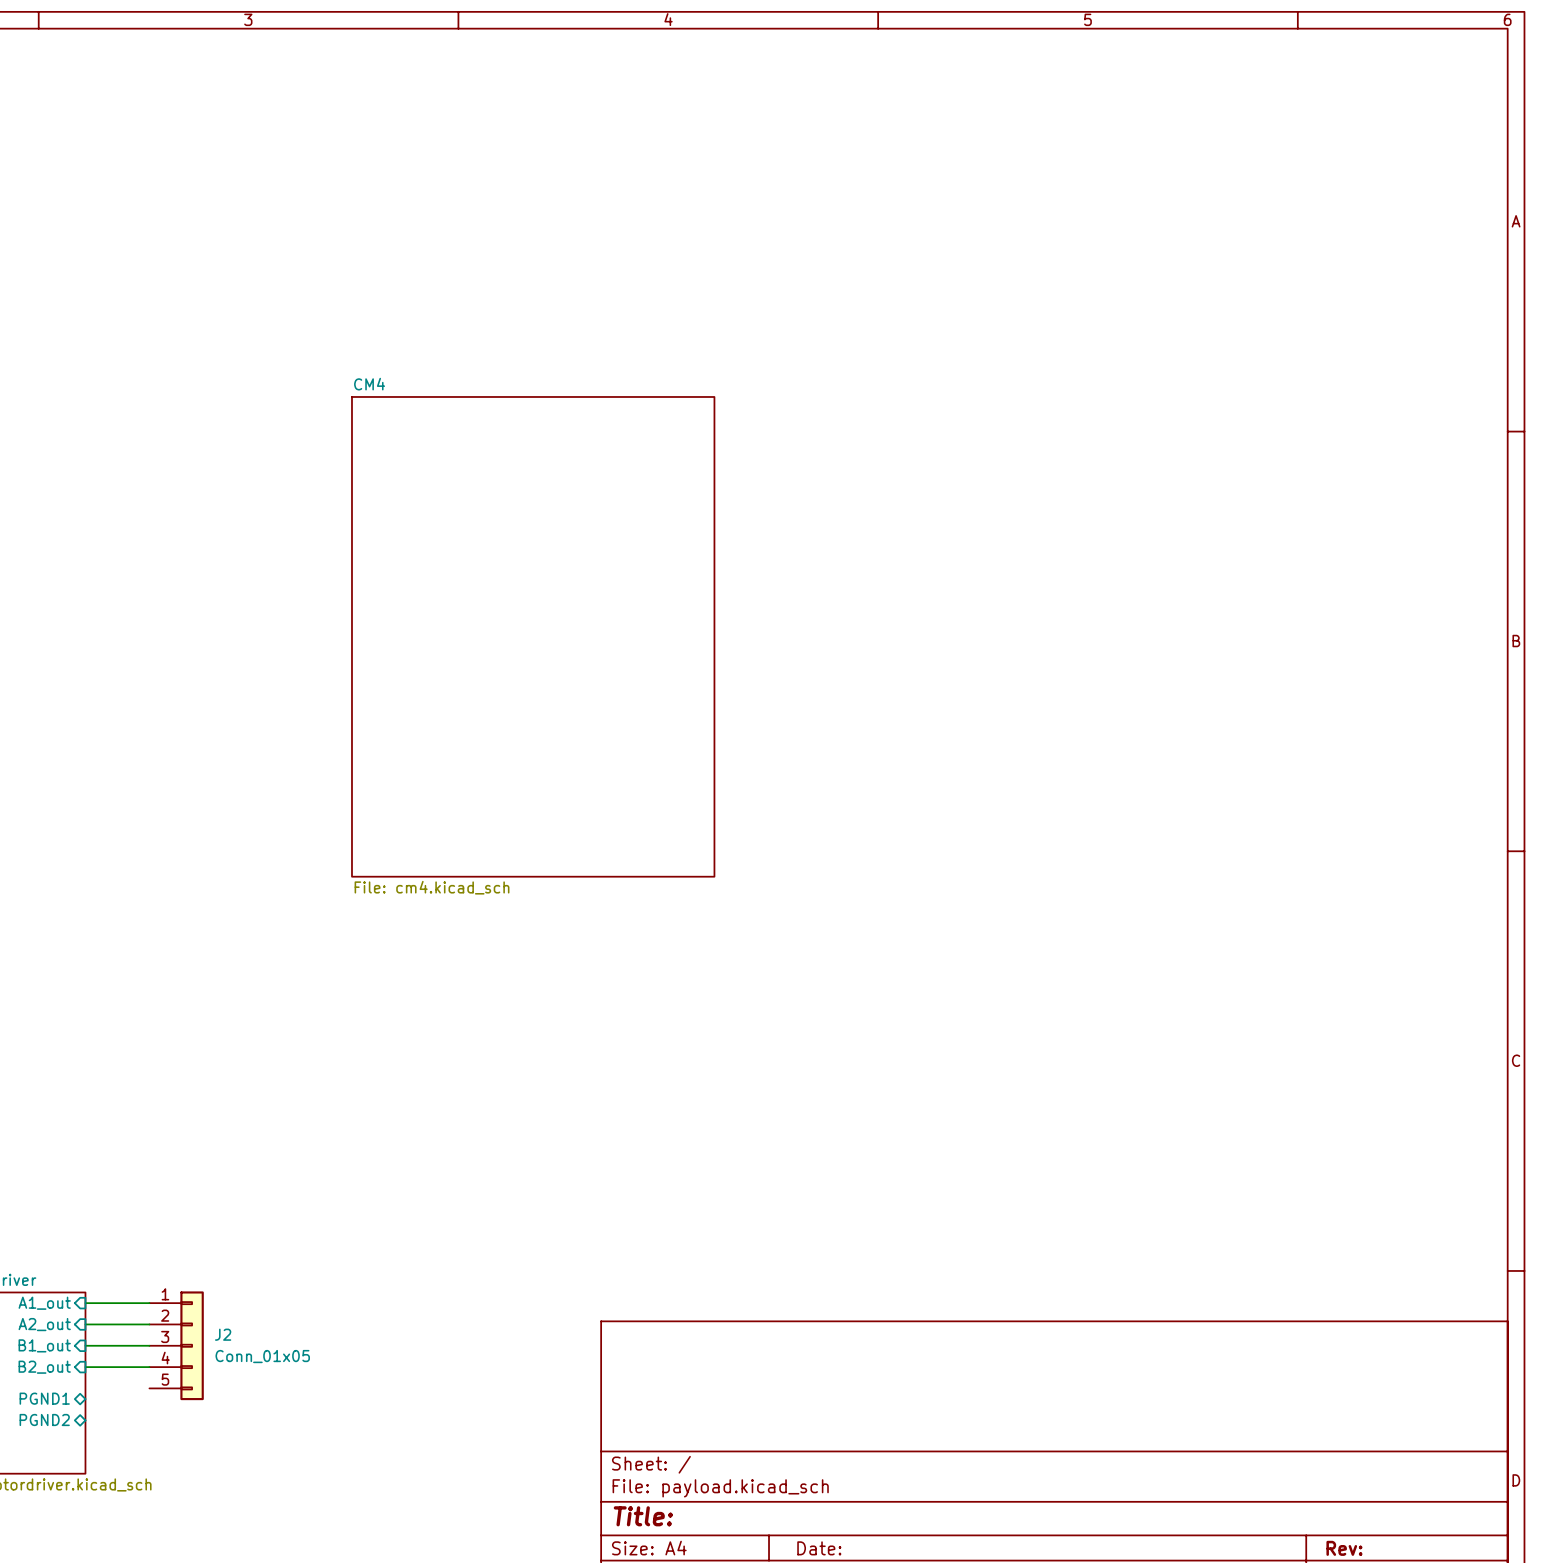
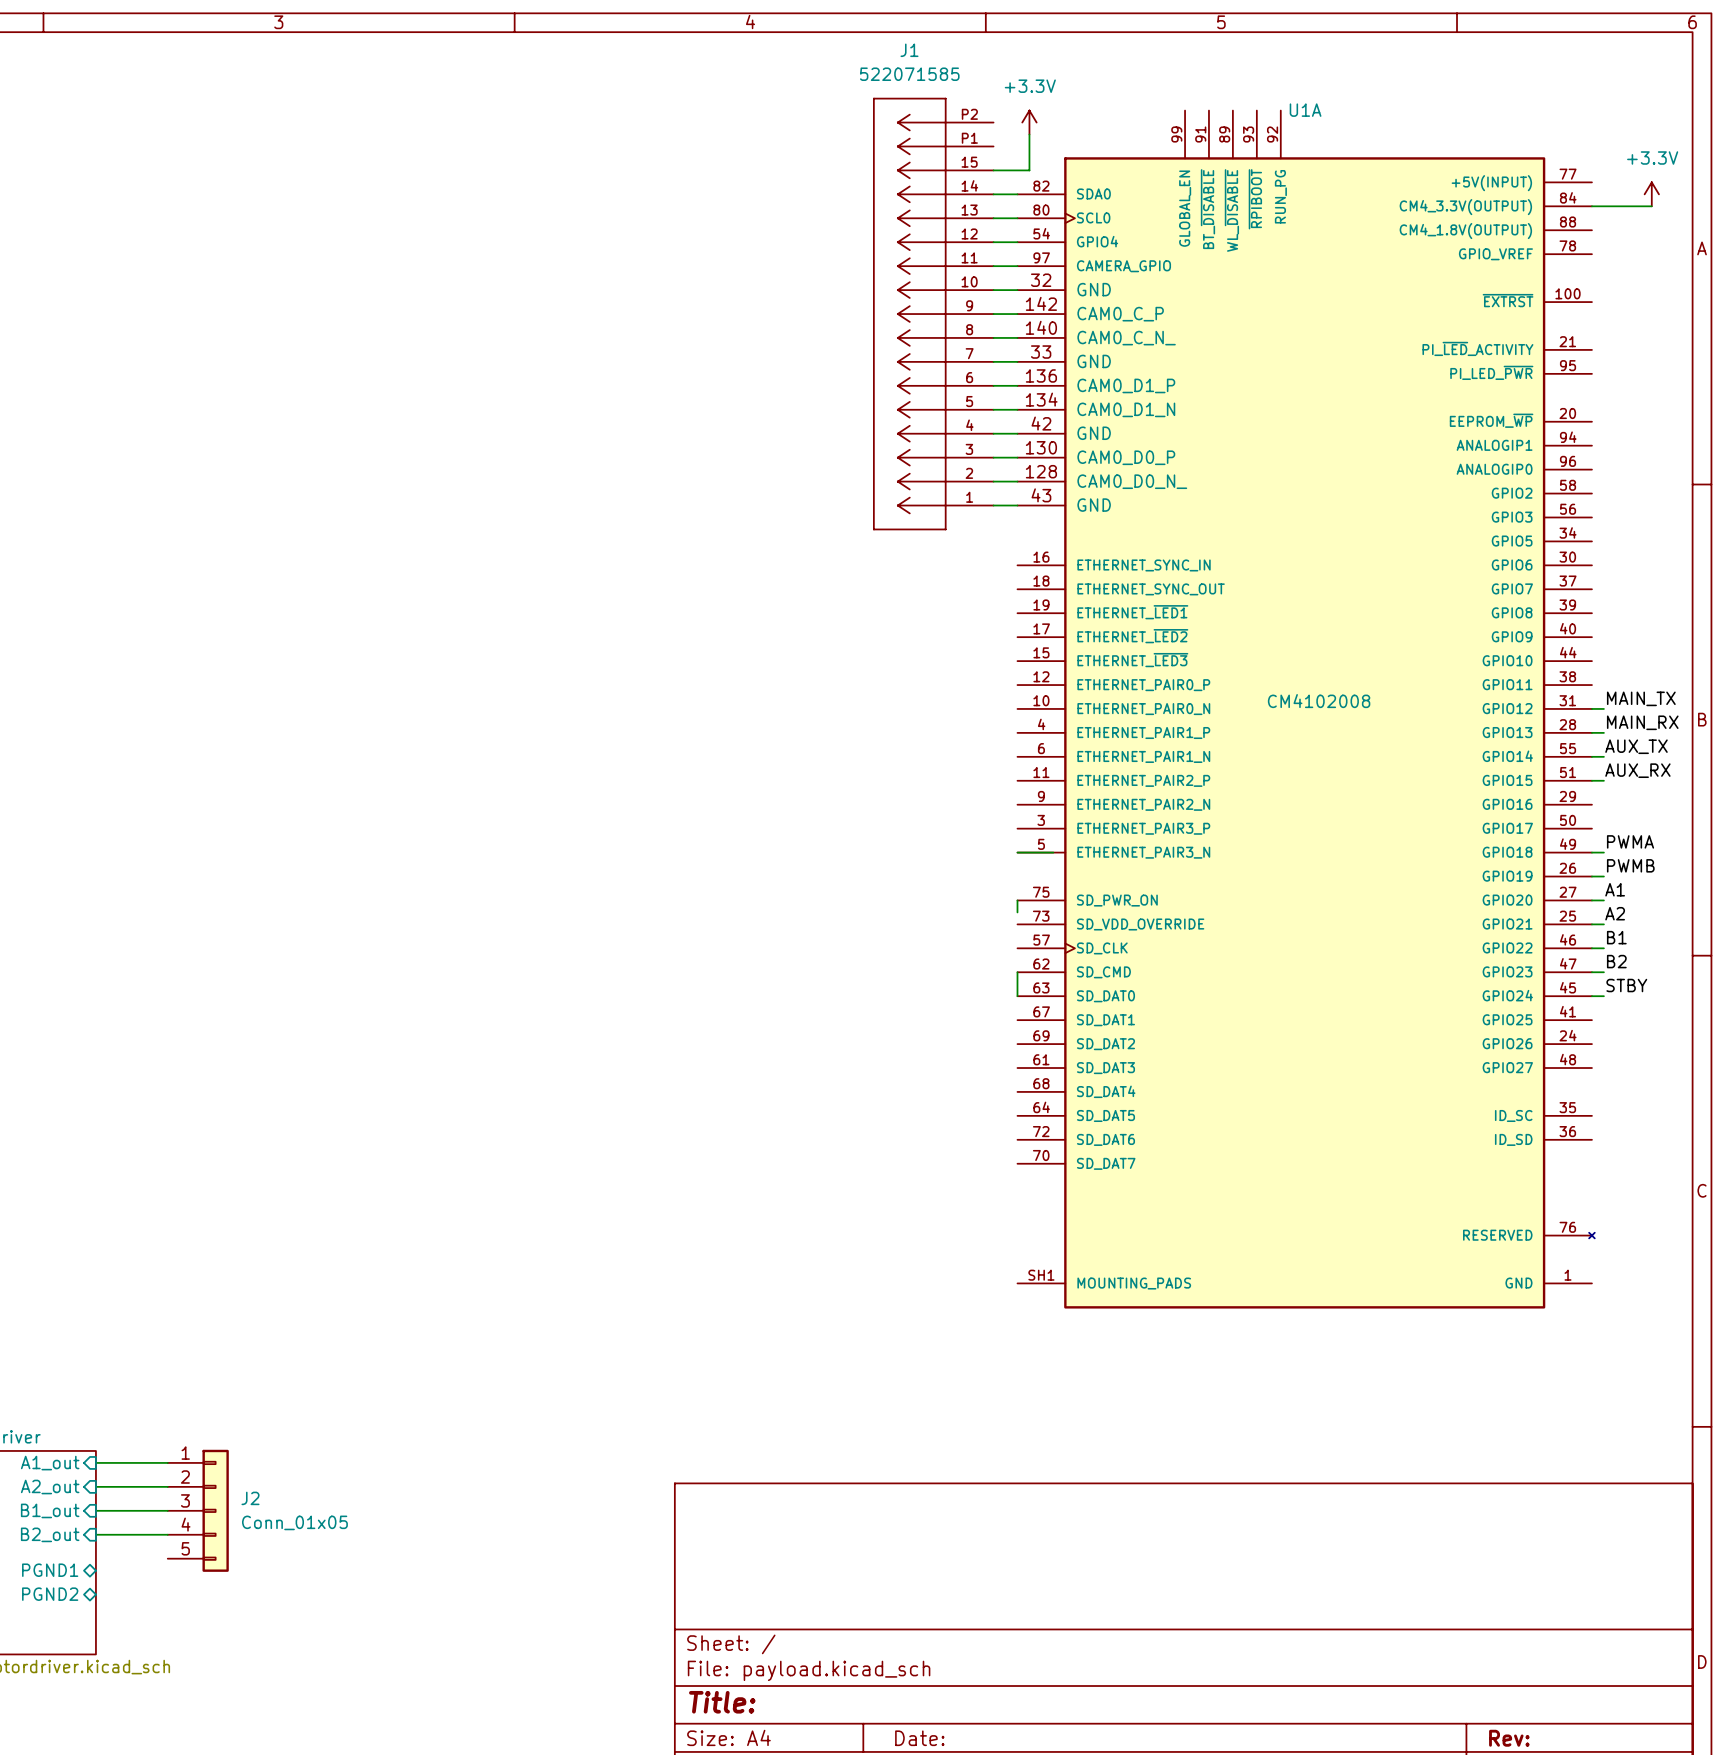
power symbol: none -> +3.3V (1029, 122)
wire: none -> (1029, 134) (1029, 170) (993, 170)
wire: none -> (993, 194) (1017, 194)
power symbol: none -> +3.3V (1651, 194)
wire: none -> (1591, 206) (1651, 206)
wire: none -> (993, 218) (1017, 218)
wire: none -> (993, 242) (1017, 242)
wire: none -> (993, 266) (1017, 266)
wire: none -> (993, 290) (1017, 290)
J1: none -> 522071585 (933, 314)
wire: none -> (993, 314) (1017, 314)
wire: none -> (993, 337) (1017, 337)
wire: none -> (993, 361) (1017, 361)
wire: none -> (993, 385) (1017, 385)
wire: none -> (993, 409) (1017, 409)
wire: none -> (993, 433) (1017, 433)
wire: none -> (993, 457) (1017, 457)
wire: none -> (993, 481) (1017, 481)
wire: none -> (993, 505) (1017, 505)
label: none -> MAIN_TX (1641, 698)
wire: none -> (1591, 708) (1603, 708)
U1A: none -> CM4102008 (1306, 709)
sheet CM4: File: cm4.kicad_sch (533, 636) -> none
label: none -> MAIN_RX (1642, 722)
wire: none -> (1591, 732) (1603, 732)
label: none -> AUX_TX (1636, 746)
wire: none -> (1591, 756) (1603, 756)
label: none -> AUX_RX (1637, 770)
wire: none -> (1591, 780) (1603, 780)
label: none -> PWMA (1630, 841)
wire: none -> (1017, 852) (1053, 852)
wire: none -> (1591, 852) (1603, 852)
label: none -> PWMB (1630, 865)
wire: none -> (1591, 876) (1603, 876)
label: none -> A1 (1615, 889)
wire: none -> (1017, 900) (1017, 912)
wire: none -> (1591, 900) (1603, 900)
label: none -> A2 (1615, 913)
wire: none -> (1591, 924) (1603, 924)
label: none -> B1 (1616, 937)
wire: none -> (1591, 948) (1603, 948)
label: none -> B2 (1616, 961)
wire: none -> (1017, 972) (1017, 996)
wire: none -> (1591, 972) (1603, 972)
label: none -> STBY (1626, 985)
wire: none -> (1591, 996) (1603, 996)

